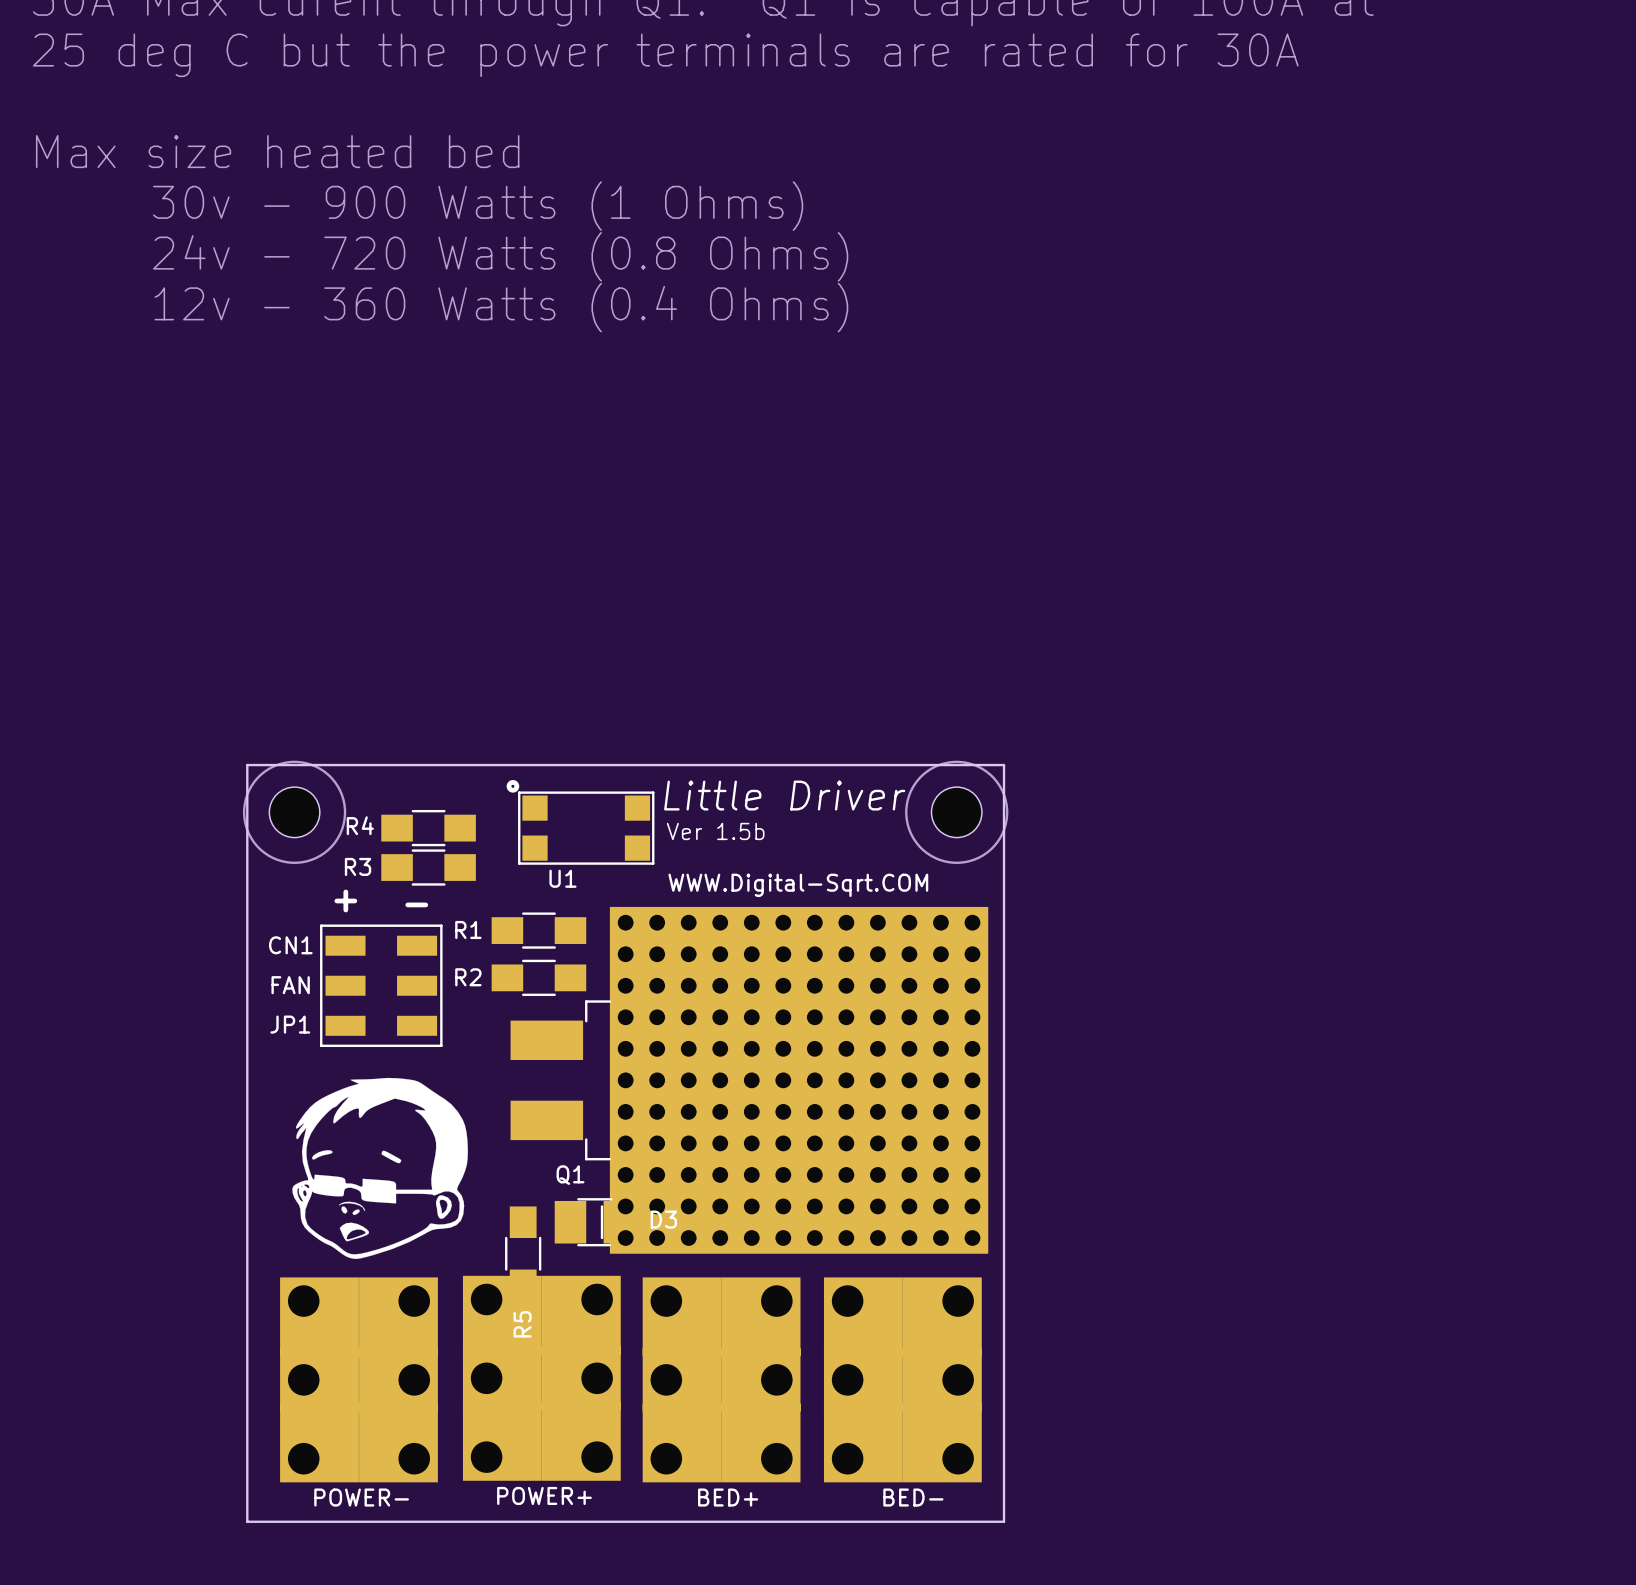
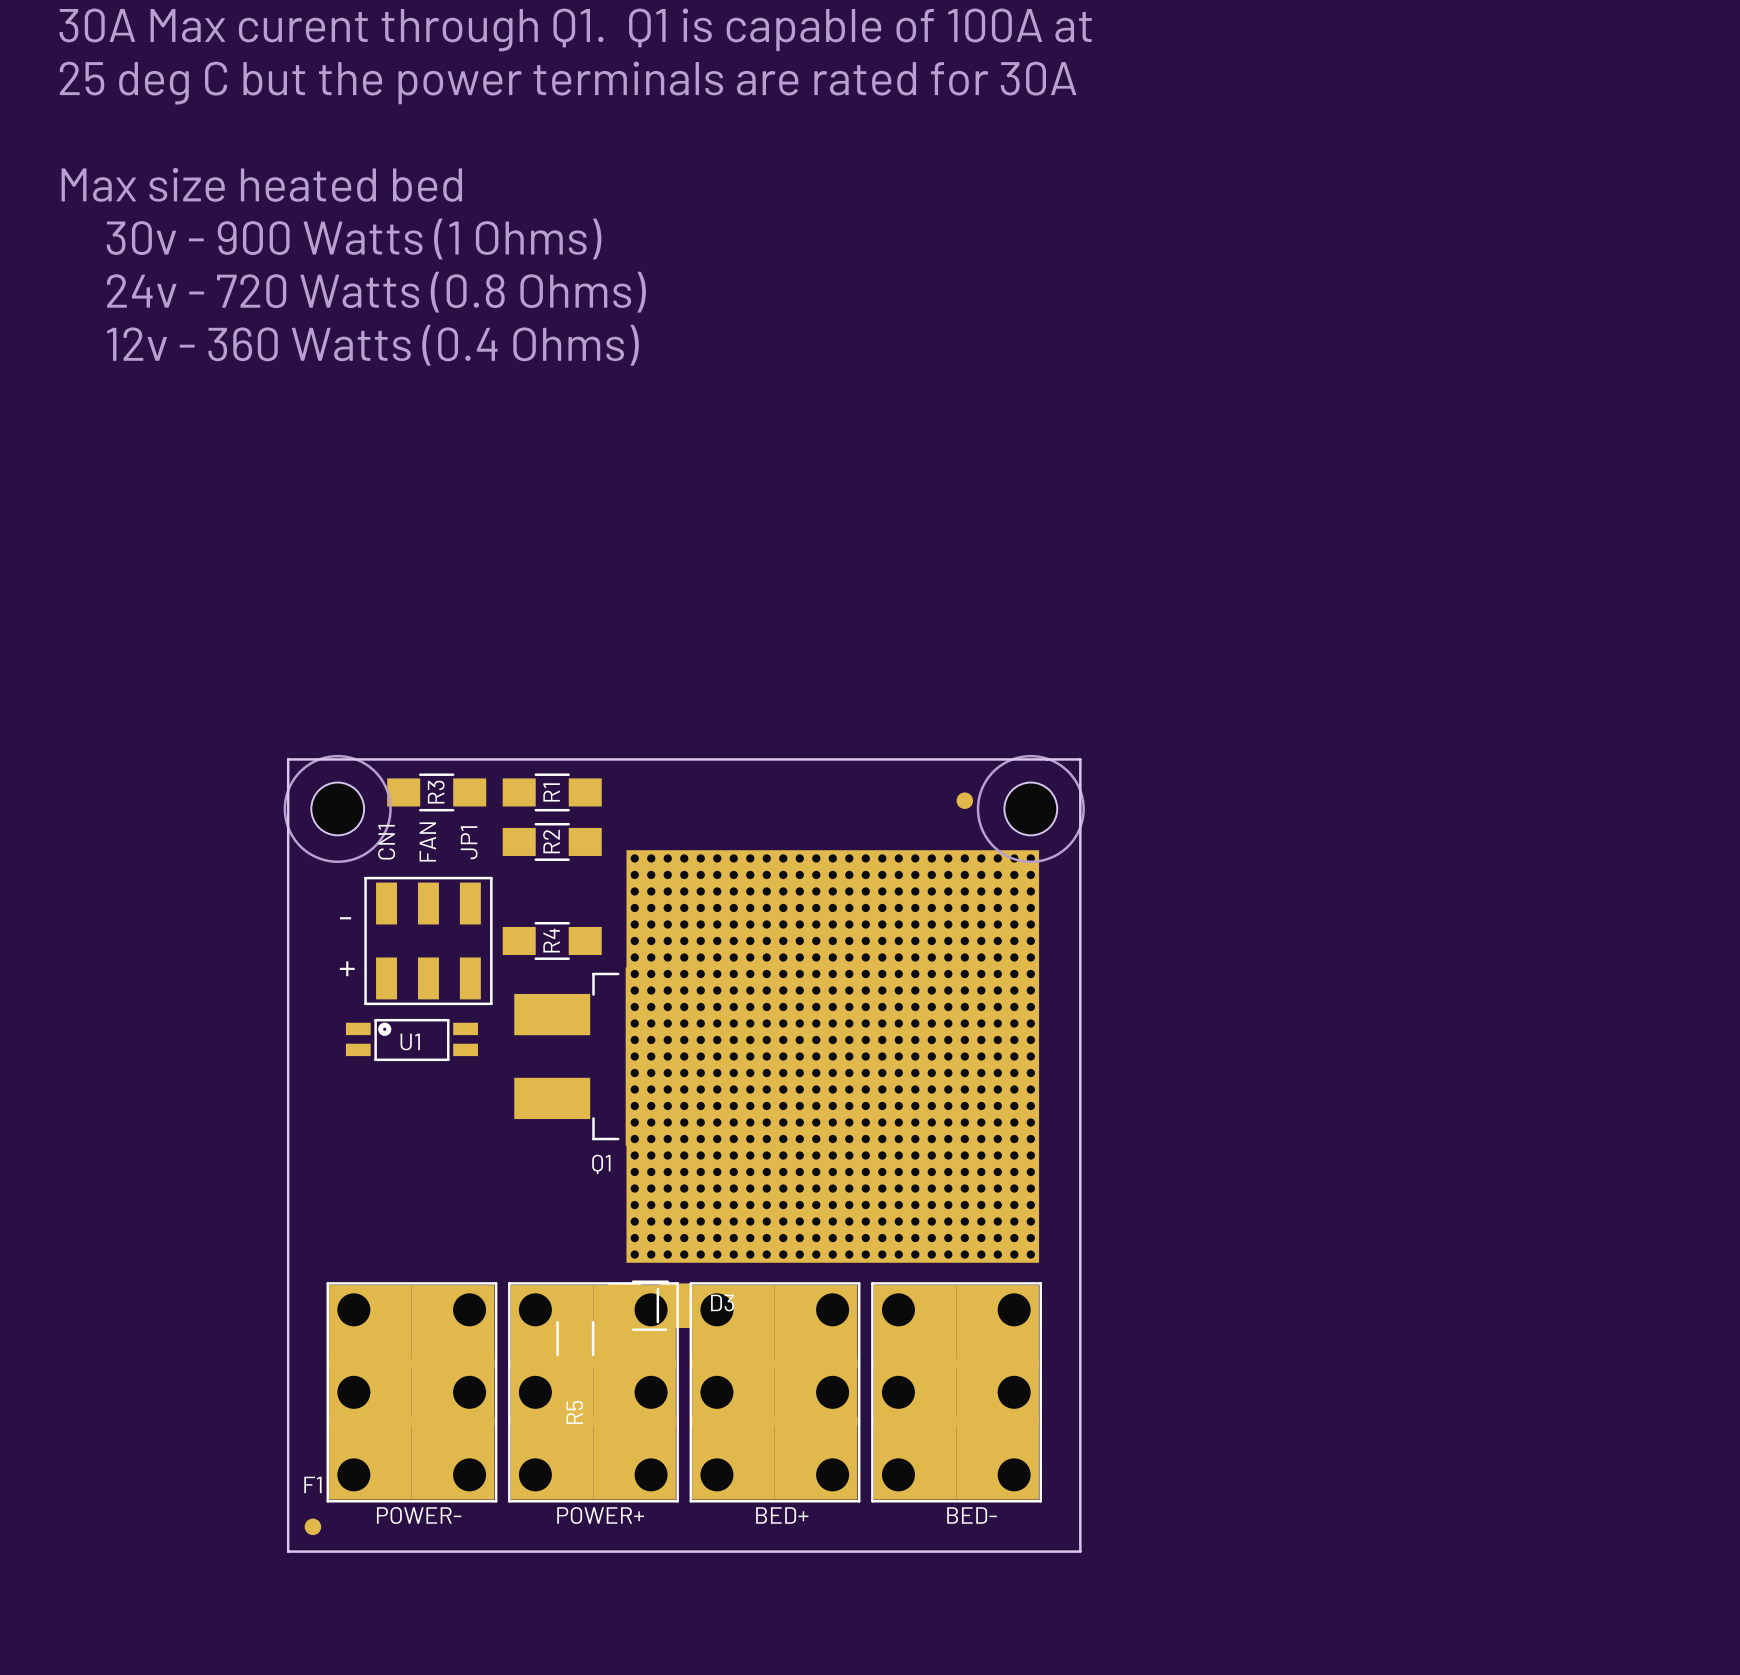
part: none -> (964, 800)
board edge: (247, 765) (1004, 765) (1004, 1521) (247, 1521) (247, 765) -> (288, 759) (1080, 759) (1080, 1551) (288, 1551) (288, 759)
U1 footprint: [506, 780, 655, 865] -> [345, 1018, 478, 1062]
text: Little Driver (784, 795) -> none
part position: (294, 812) -> (337, 808)
part position: (956, 812) -> (1030, 808)
R4 name rotation: 0° (360, 825) -> 90° counterclockwise (551, 940)
R4 name position: R4 (360, 825) -> R4 (551, 940)
R4 position: (428, 828) -> (552, 940)
text: Ver 1.5b (715, 831) -> none
R3 name rotation: 0° (358, 866) -> 90° counterclockwise (436, 792)
R3 name position: R3 (358, 866) -> R3 (436, 792)
R3 position: (428, 867) -> (436, 792)
U1 name position: U1 (562, 878) -> U1 (410, 1041)
text: WWW.Digital-Sqrt.COM (798, 885) -> none
text position: + (345, 900) -> + (347, 968)
text position: - (416, 904) -> - (345, 918)
Q1 footprint: [510, 906, 989, 1254] -> [514, 850, 1040, 1263]
R1 name rotation: 0° (468, 929) -> 90° counterclockwise (551, 792)
R1 name position: R1 (468, 929) -> R1 (551, 792)
R1 position: (538, 930) -> (552, 792)
CN1 name position: CN1 (290, 945) -> CN1 (386, 842)
R2 name rotation: 0° (468, 977) -> 90° counterclockwise (551, 841)
R2 name position: R2 (468, 977) -> R2 (551, 841)
R2 position: (538, 977) -> (552, 841)
text rotation: 0° (290, 985) -> 90° counterclockwise (427, 841)
text position: FAN (290, 985) -> FAN (427, 841)
CN1 rotation: 0° (381, 985) -> 90° clockwise (428, 940)
CN1 position: (381, 985) -> (428, 940)
text rotation: 0° (290, 1024) -> 90° counterclockwise (469, 842)
text position: JP1 (290, 1024) -> JP1 (469, 842)
drawing: [292, 1077, 468, 1259] -> none
POWER-: none -> (411, 1392)
POWER+: none -> (593, 1392)
BED+: none -> (775, 1392)
BED-: none -> (956, 1392)
POWER+: (541, 1378) -> none
POWER-: (358, 1379) -> none
BED+: (721, 1379) -> none
BED-: (902, 1379) -> none
F1: none -> (312, 1526)

